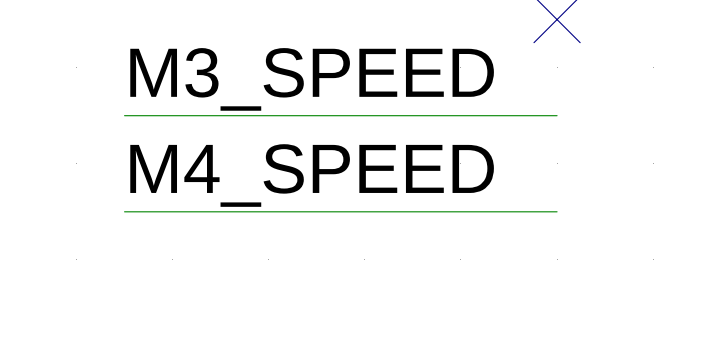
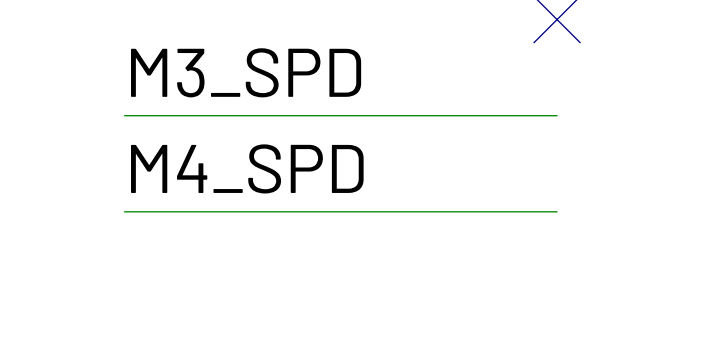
label: M3_SPEED (312, 79) -> M3_SPD (246, 72)
label: M4_SPEED (312, 175) -> M4_SPD (247, 168)

